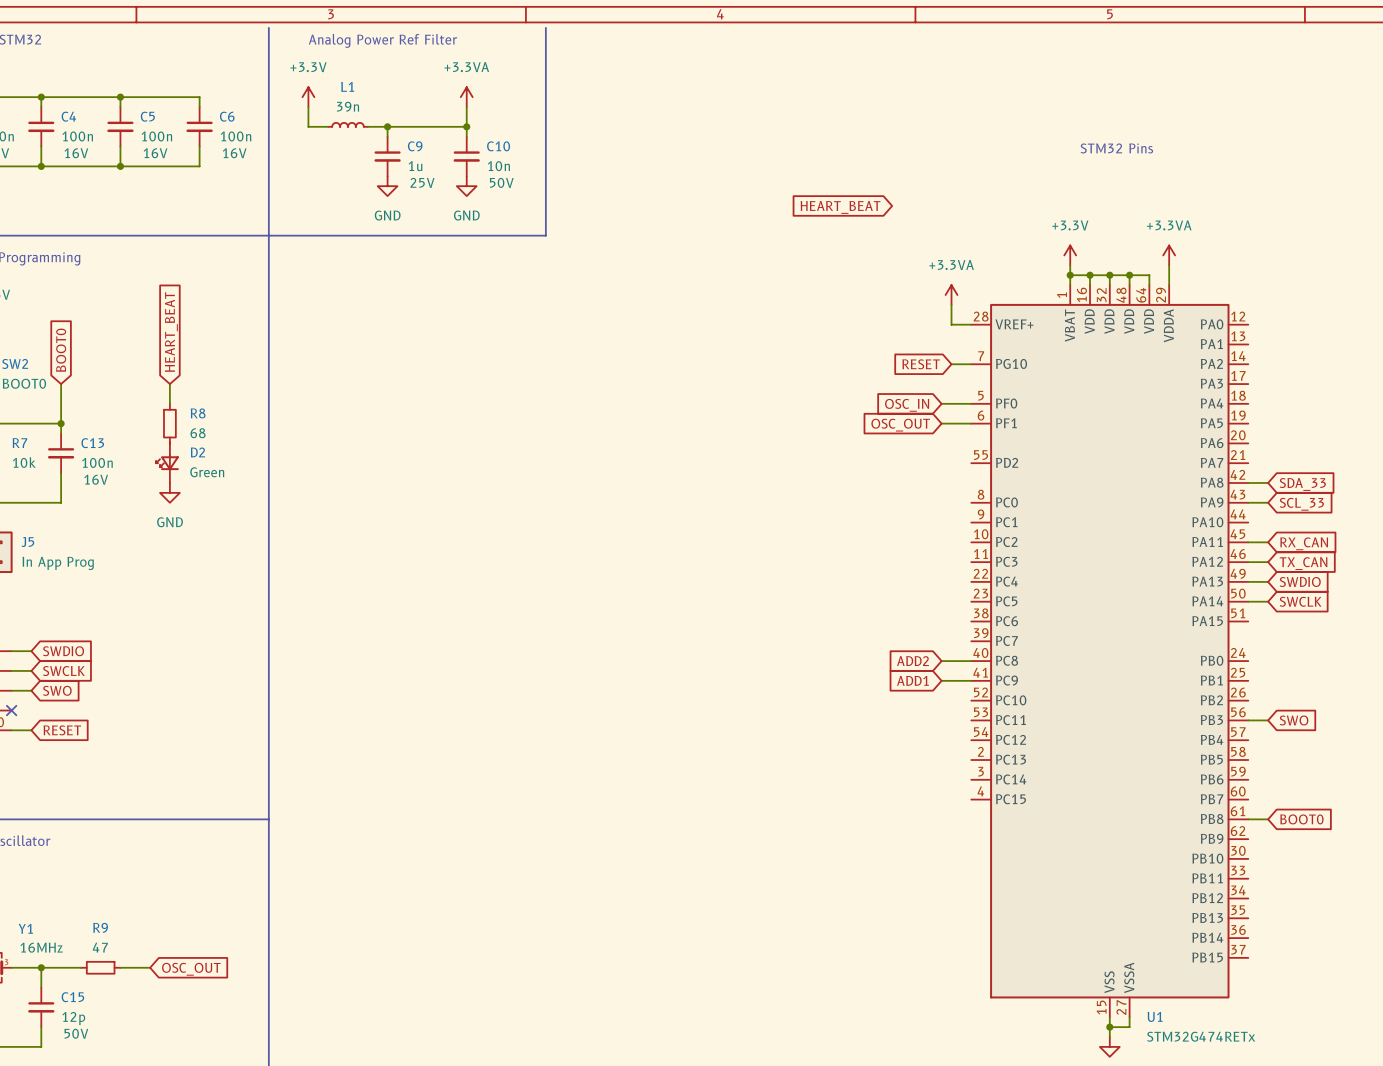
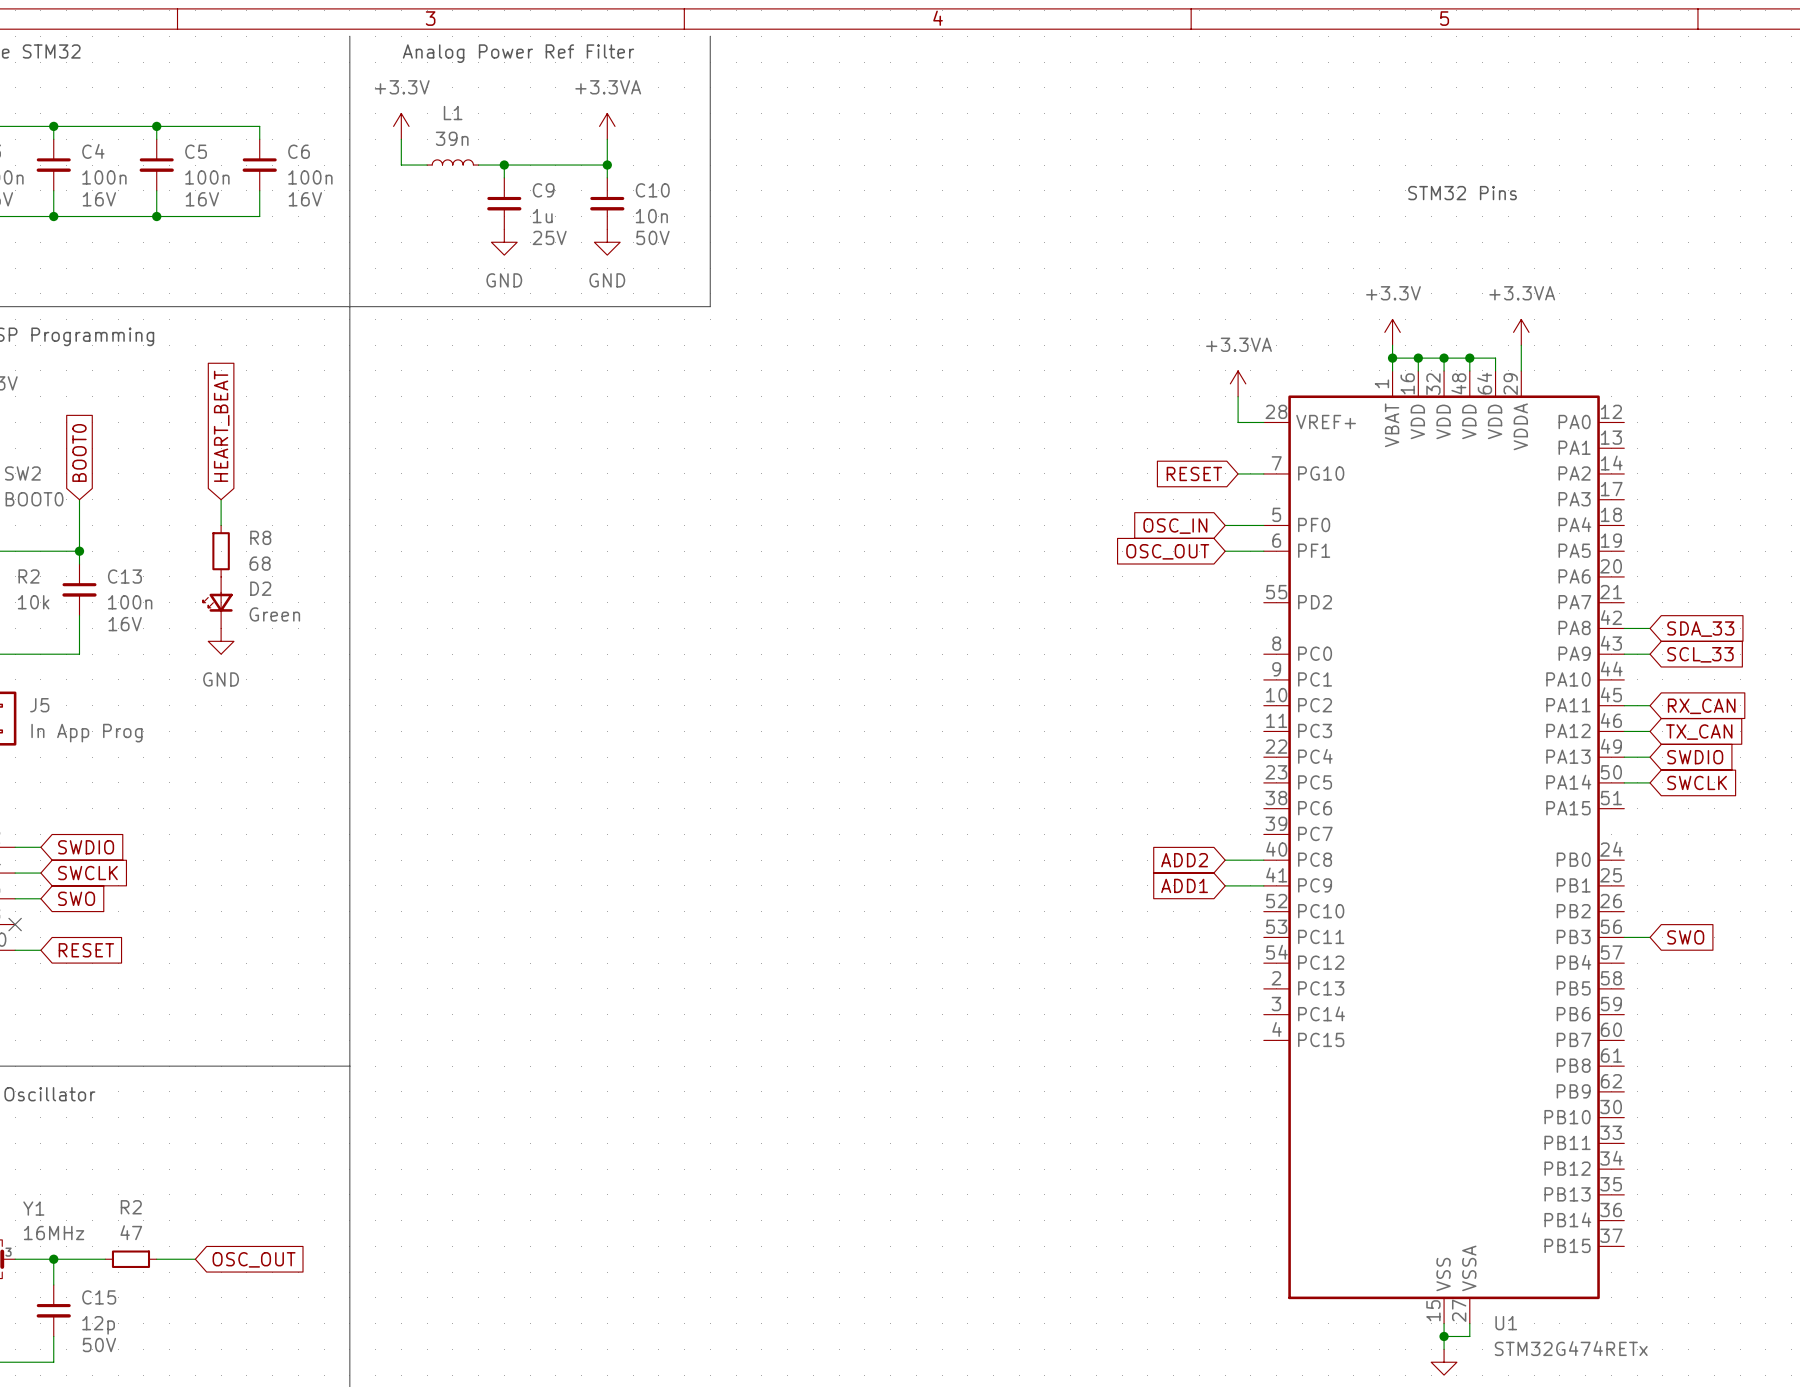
global label: HEART_BEAT (840, 207) -> none
R7 name: R7 (19, 443) -> R2 (29, 576)
wire: (1248, 819) (1268, 819) -> none
global label: BOOT0 (1301, 819) -> none
R9 name: R9 (100, 927) -> R2 (131, 1207)

